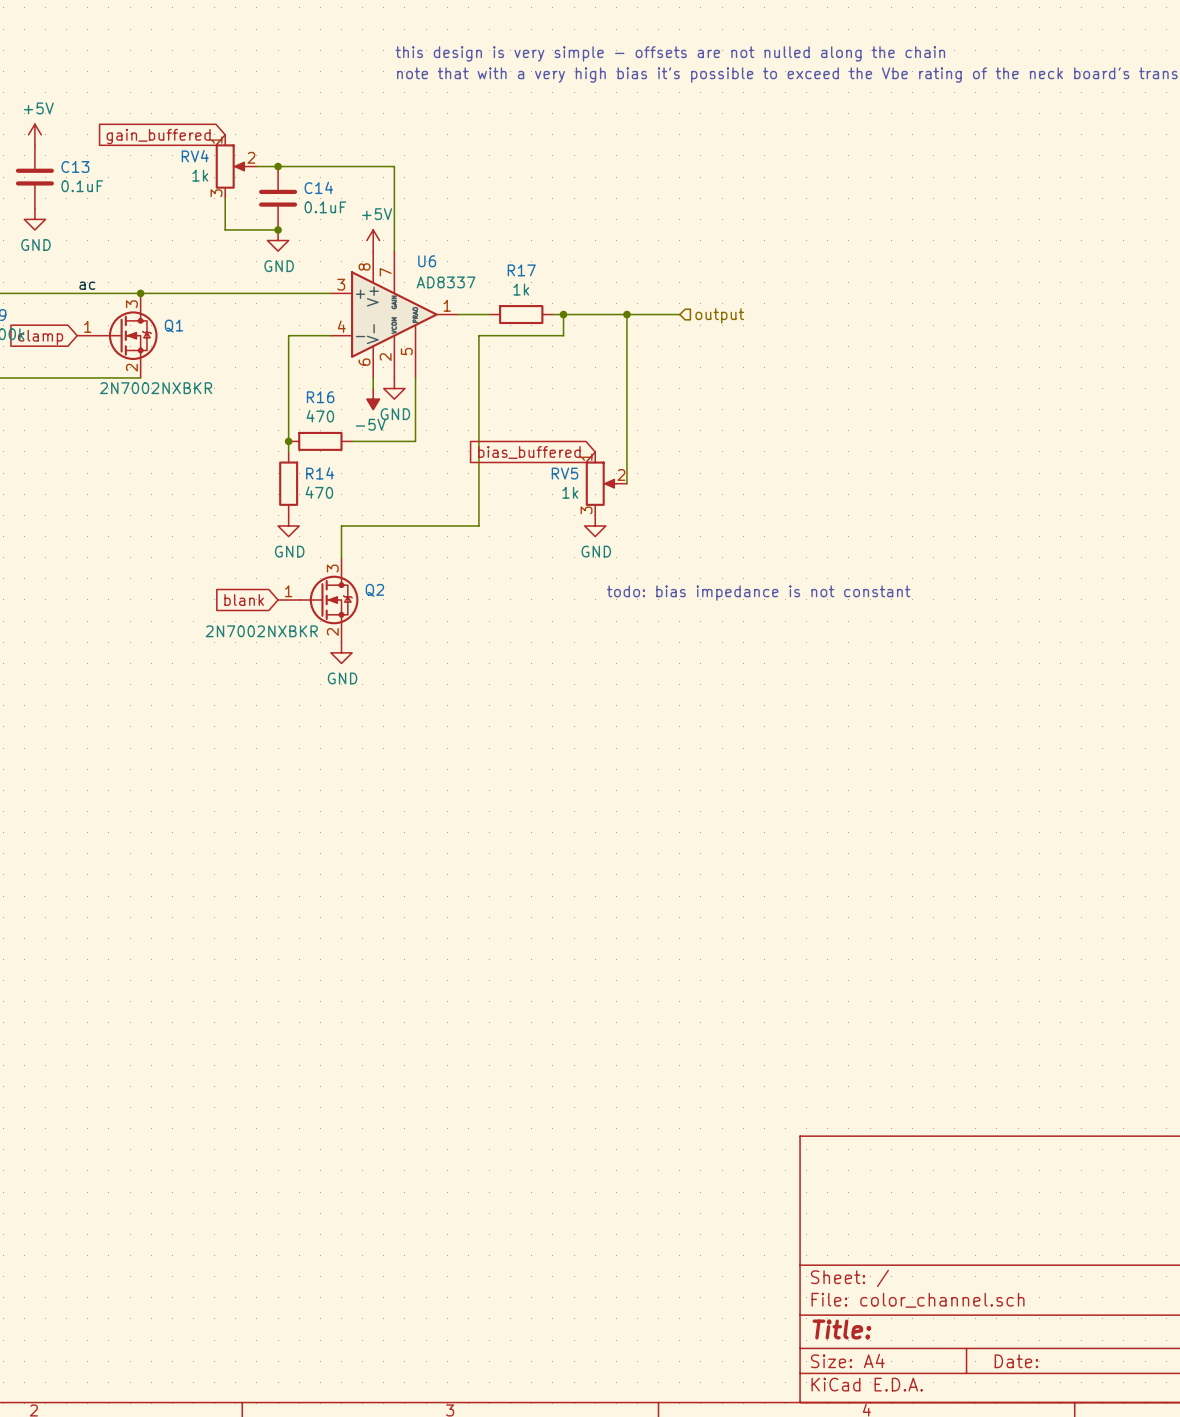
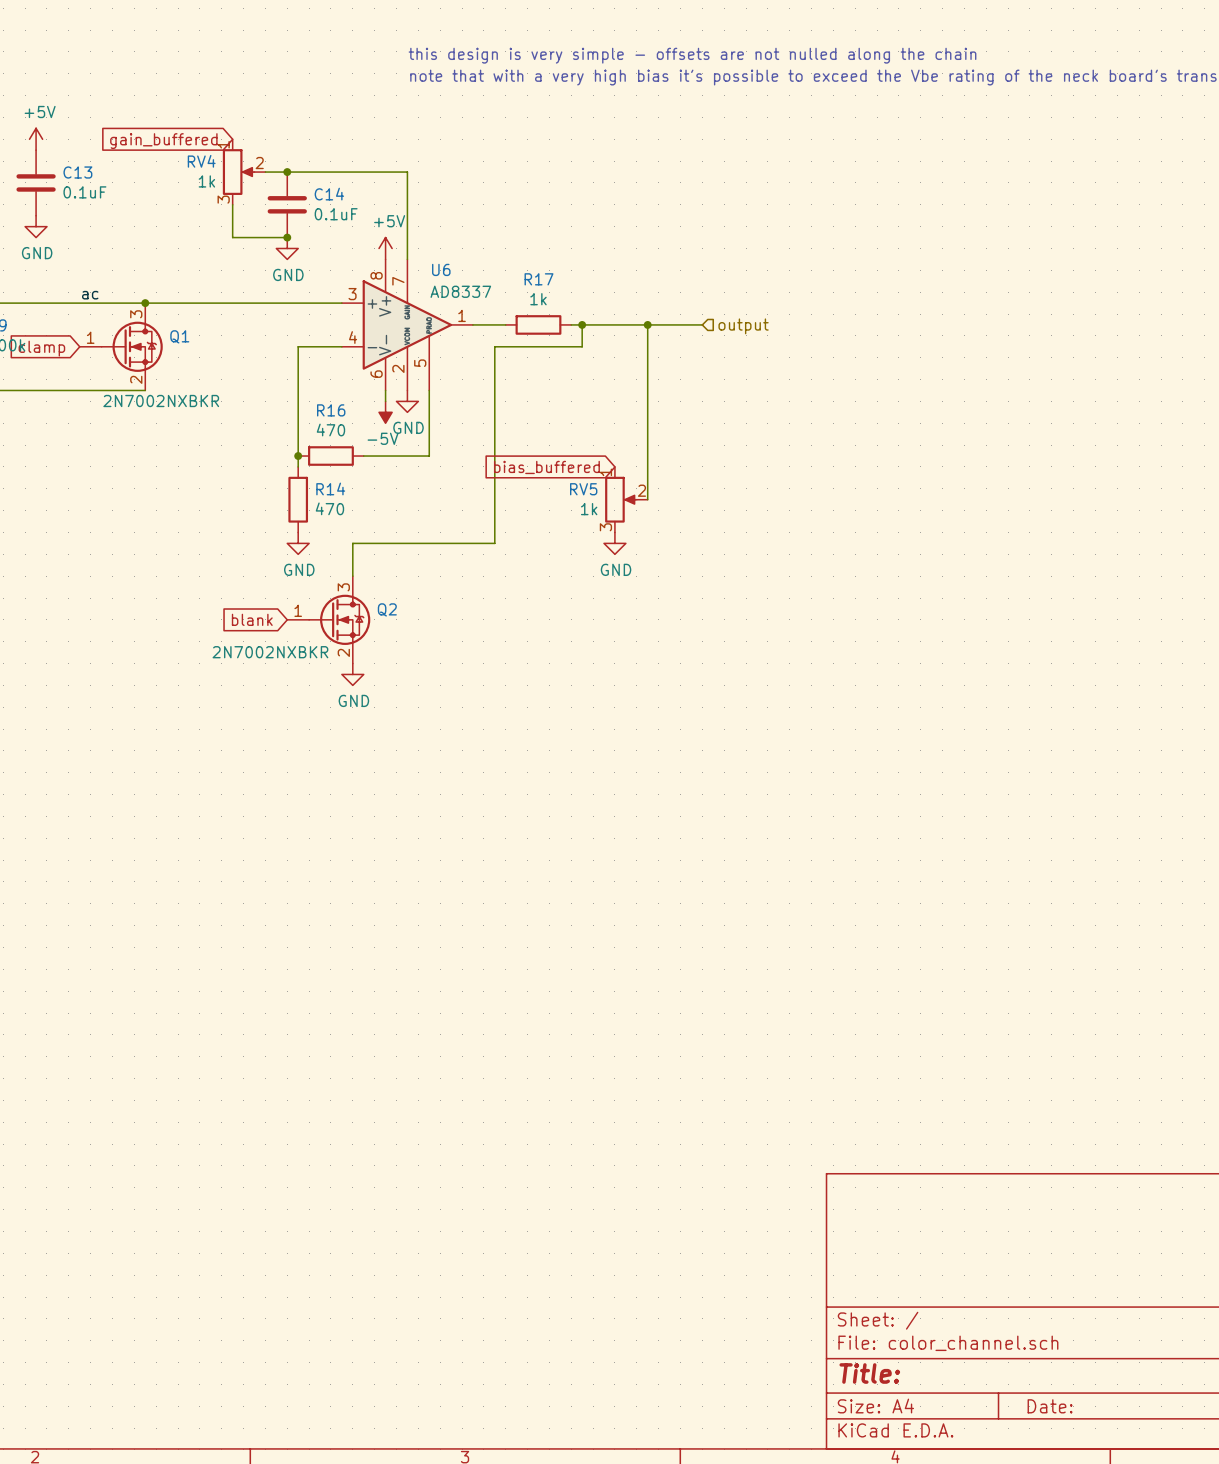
text: todo: bias impedance is not constant (758, 593) -> none

